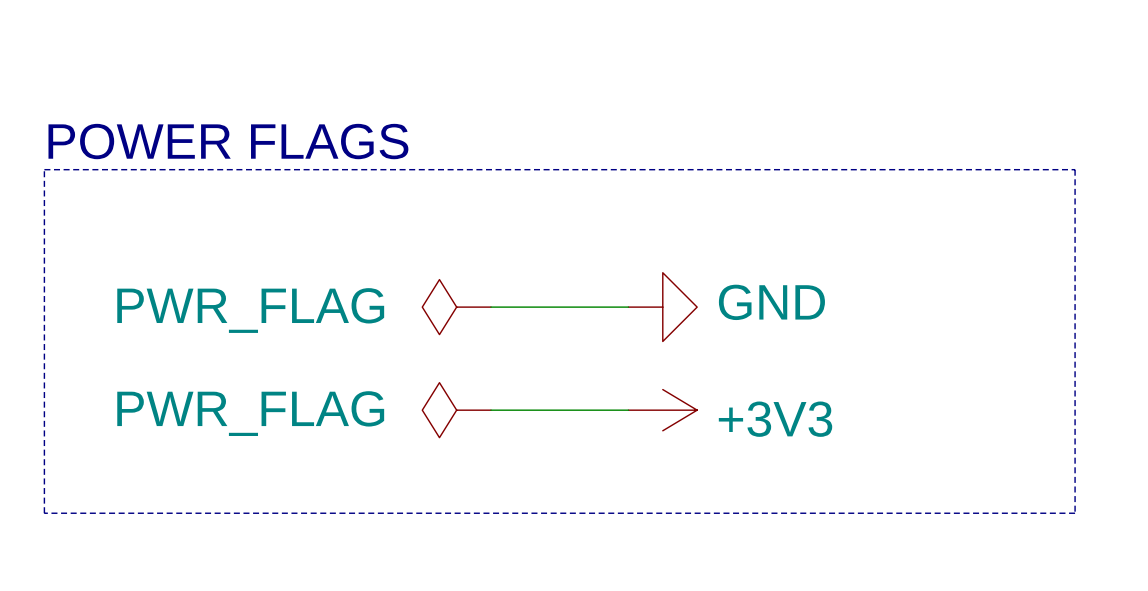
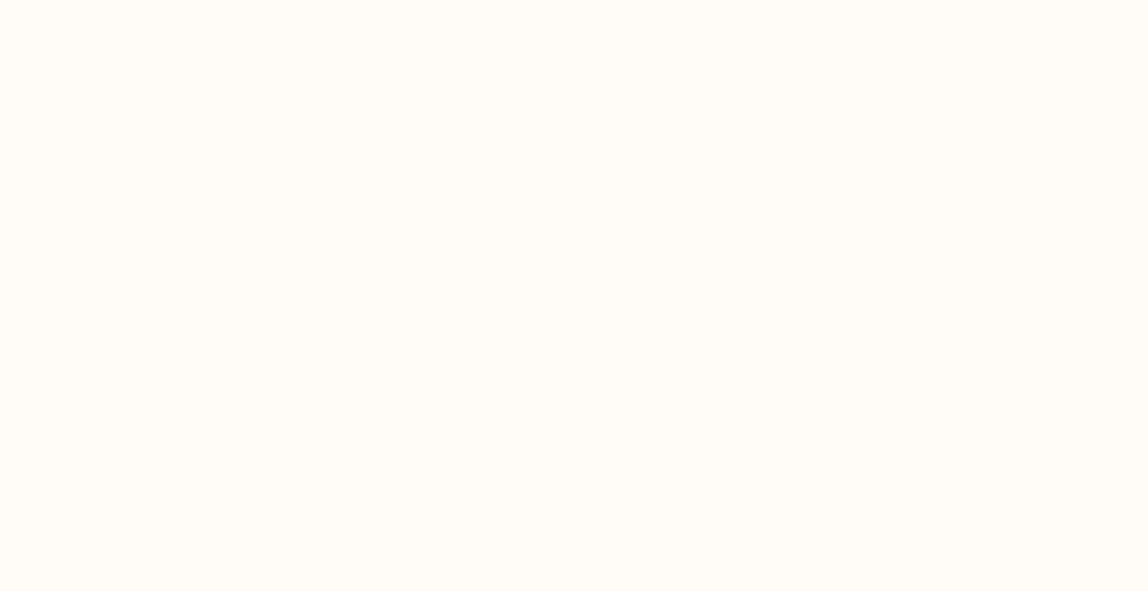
text: POWER FLAGS (228, 141) -> none
line: (44, 169) (1075, 169) (1075, 513) (44, 513) (44, 169) -> none
power symbol: PWR_FLAG (456, 307) -> none
wire: (491, 307) (628, 307) -> none
power symbol: GND (662, 307) -> none
power symbol: PWR_FLAG (456, 410) -> none
wire: (491, 410) (628, 410) -> none
power symbol: +3V3 (662, 410) -> none

